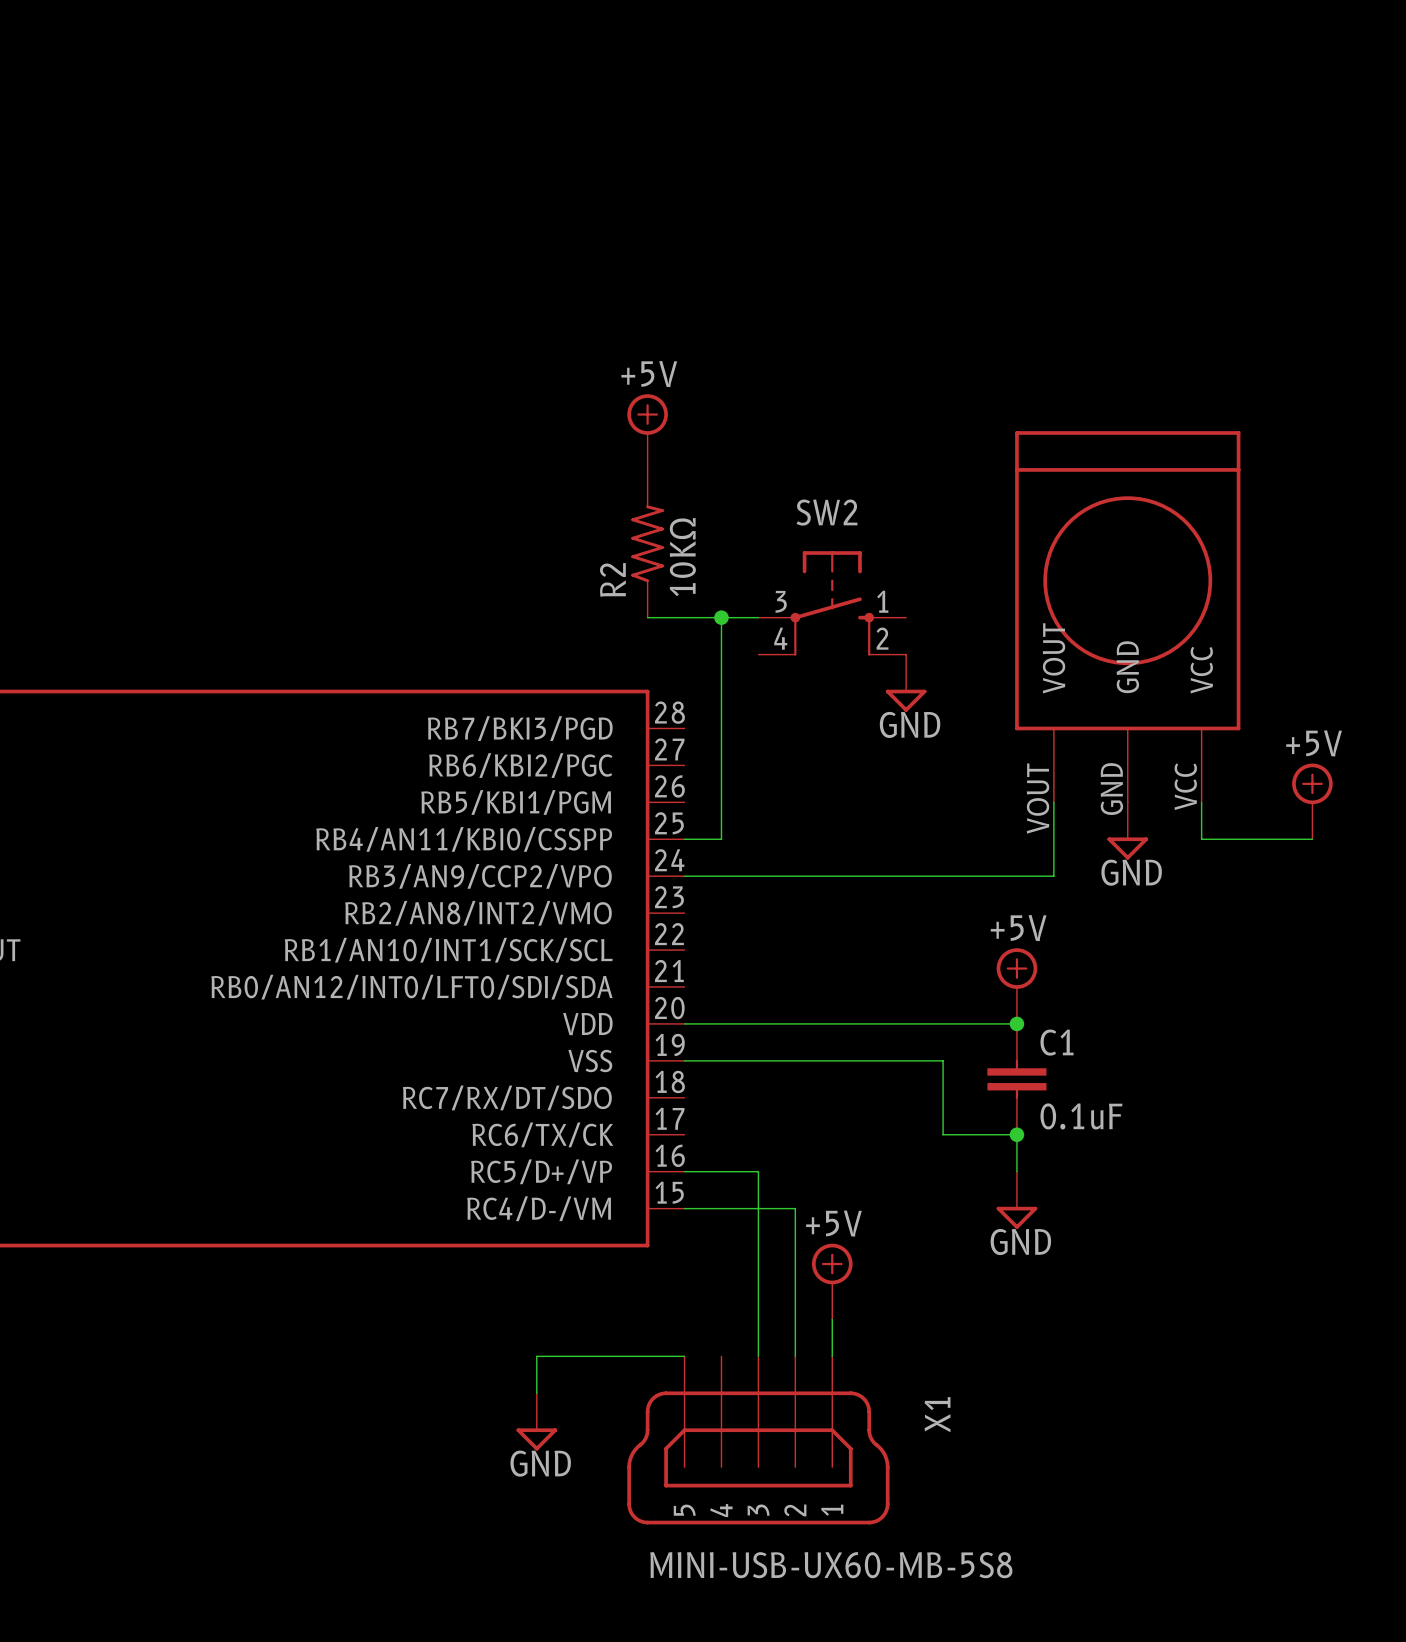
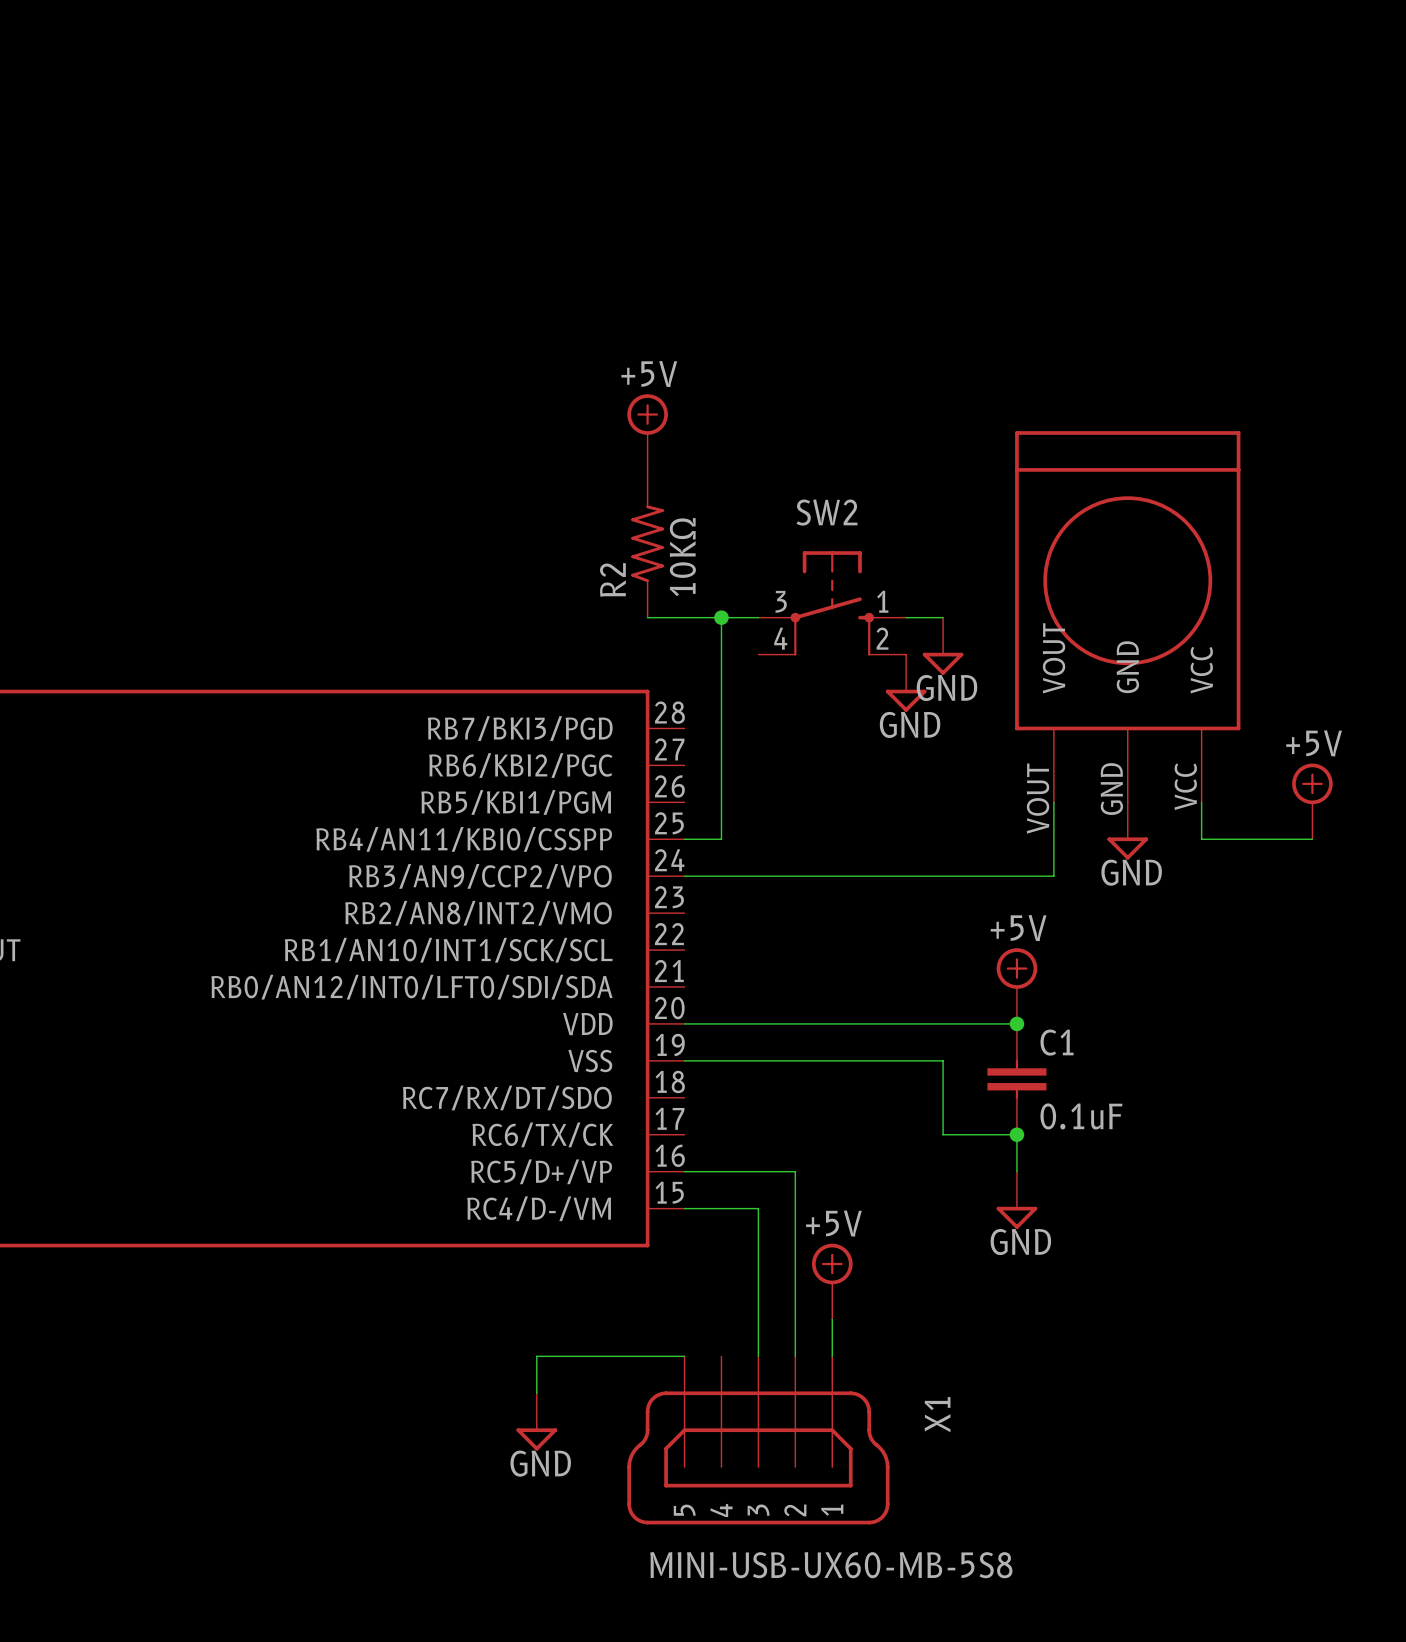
wire: none -> (906, 617) (943, 617)
power symbol: none -> GND (943, 646)
wire: (758, 1171) (758, 1208) (795, 1208) -> (758, 1171) (795, 1171) (795, 1208)

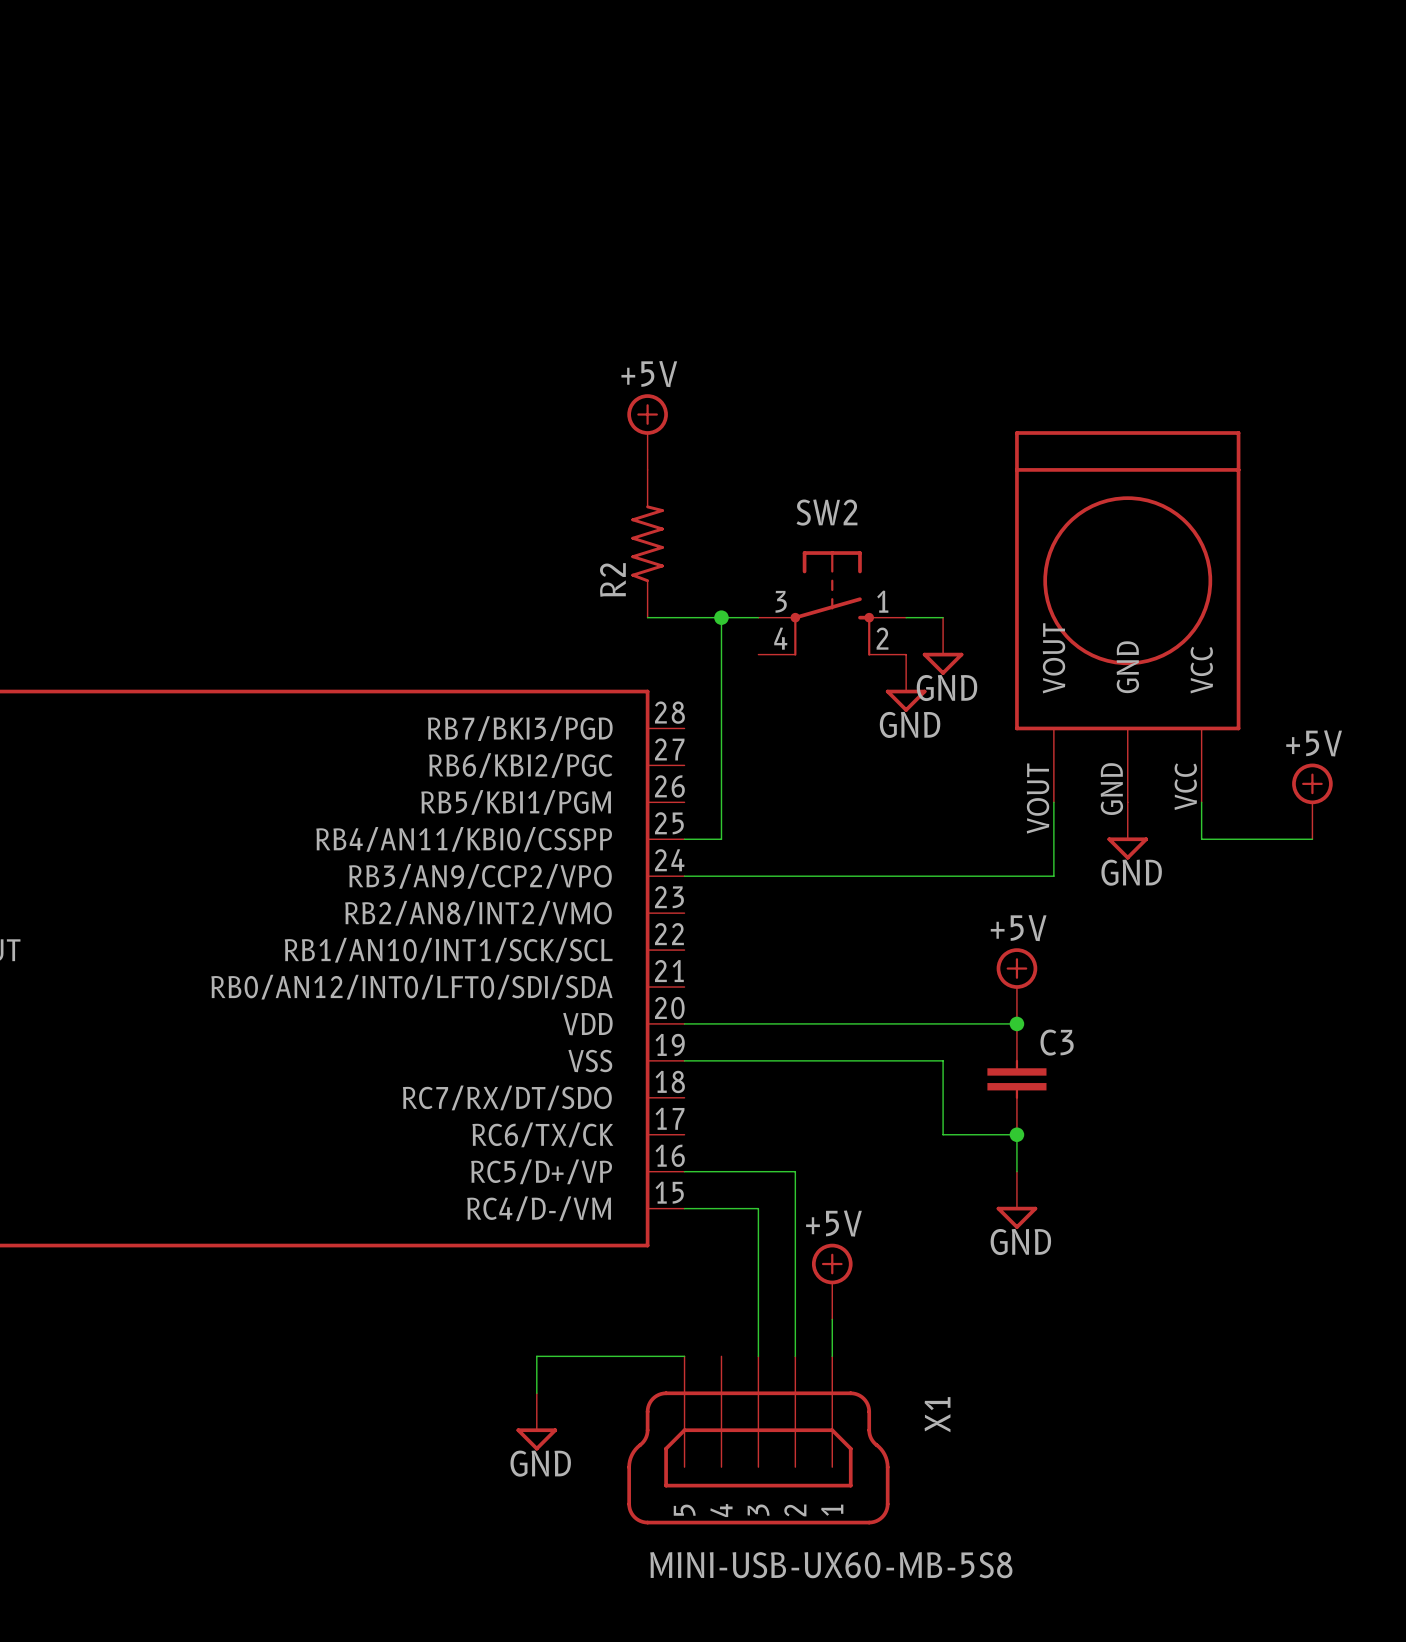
R2 value: 10KΩ (682, 557) -> none
C1 name: C1 (1057, 1042) -> C3 (1057, 1042)
C1 value: 0.1uF (1081, 1116) -> none

